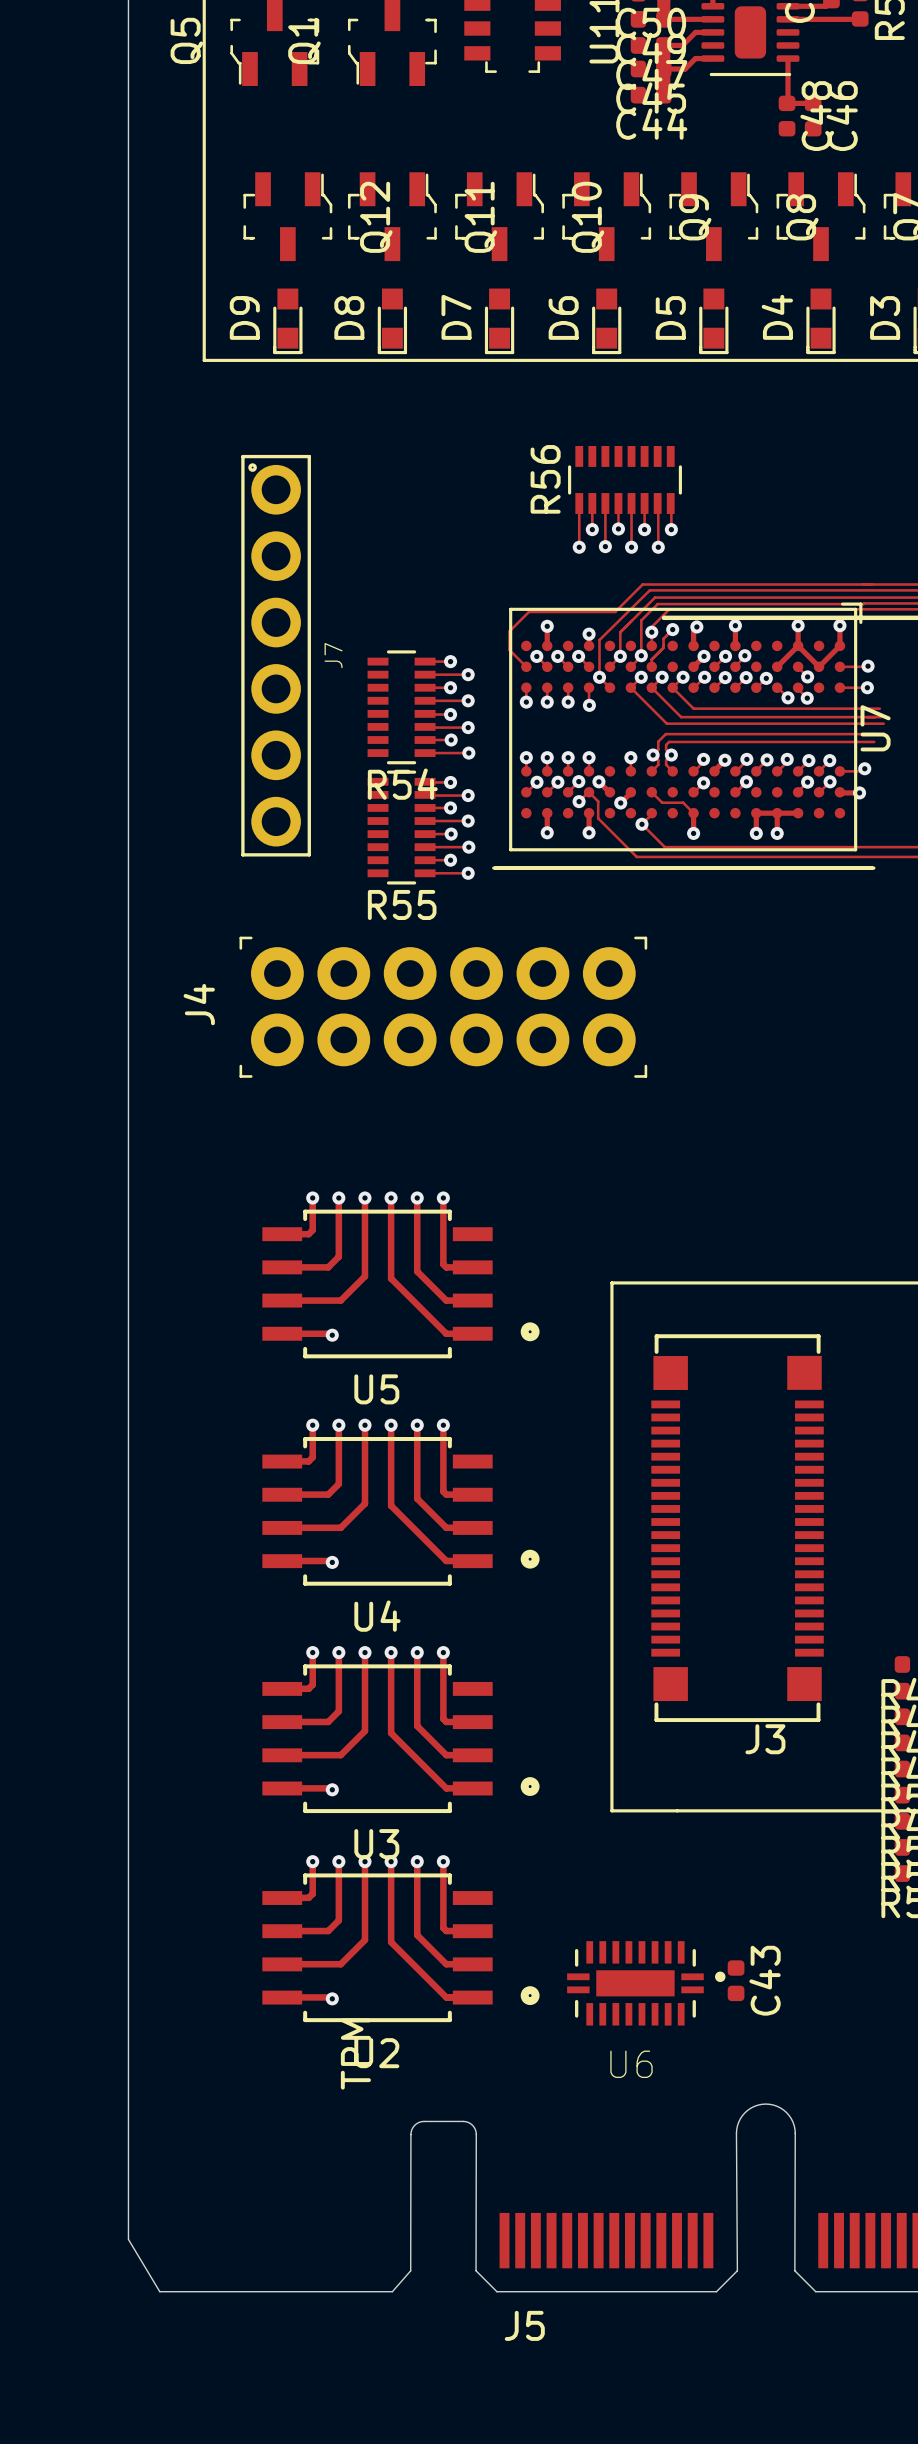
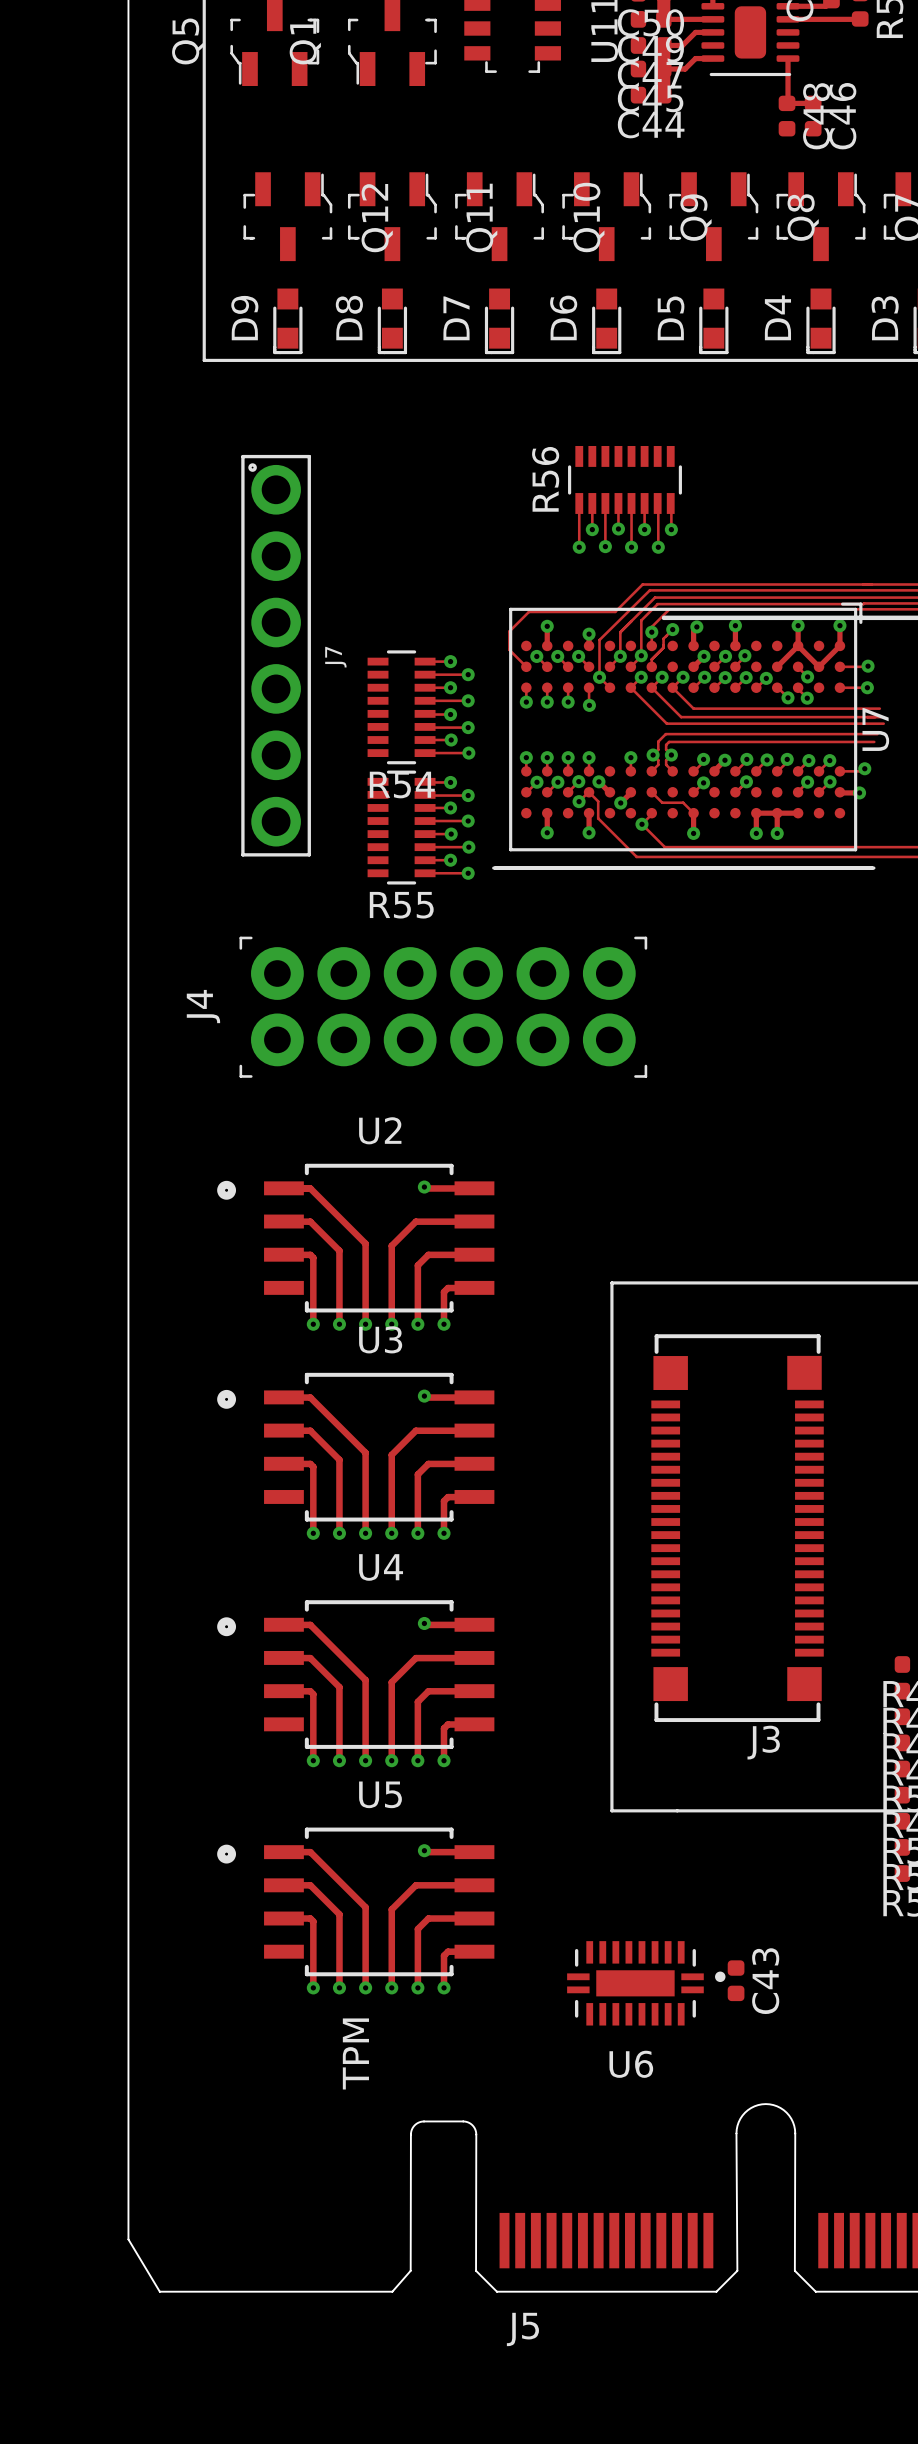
track: none -> (424, 1187) (474, 1188)
track: none -> (283, 1188) (310, 1188) (365, 1243) (365, 1324)
track: (312, 1198) (312, 1230) (308, 1234) (282, 1234) -> none
via: (312, 1198) -> none
track: (338, 1198) (338, 1256) (328, 1267) (282, 1267) -> none
via: (338, 1198) -> none
track: (364, 1198) (364, 1276) (340, 1300) (282, 1300) -> none
via: (364, 1198) -> none
track: (391, 1198) (391, 1278) (446, 1333) (472, 1333) -> none
via: (391, 1198) -> none
track: (417, 1198) (417, 1271) (446, 1300) (472, 1300) -> none
via position: (417, 1198) -> (424, 1187)
track: (443, 1198) (443, 1264) (446, 1267) (472, 1267) -> none
via: (443, 1198) -> none
track: none -> (283, 1221) (310, 1221) (339, 1250) (339, 1324)
track: none -> (474, 1221) (415, 1221) (391, 1245) (391, 1324)
track: none -> (283, 1254) (310, 1254) (313, 1257) (313, 1324)
track: none -> (474, 1254) (428, 1254) (417, 1265) (417, 1324)
U5 rotation: 0° (400, 1283) -> 180° (355, 1901)
U5 position: (400, 1283) -> (355, 1901)
track: none -> (474, 1288) (447, 1288) (444, 1292) (444, 1324)
via: none -> (313, 1324)
via: none -> (365, 1324)
via: none -> (391, 1324)
via: none -> (417, 1324)
via: none -> (444, 1324)
track: (282, 1333) (332, 1335) -> none
via position: (332, 1335) -> (339, 1324)
track: none -> (424, 1396) (474, 1397)
via: none -> (424, 1396)
track: none -> (283, 1397) (310, 1397) (365, 1452) (365, 1533)
track: (312, 1425) (312, 1457) (308, 1461) (282, 1461) -> none
via: (312, 1425) -> none
track: (338, 1425) (338, 1484) (328, 1494) (282, 1494) -> none
via: (338, 1425) -> none
track: (364, 1425) (364, 1503) (340, 1527) (282, 1527) -> none
via: (364, 1425) -> none
track: (391, 1425) (391, 1505) (446, 1560) (472, 1560) -> none
via: (391, 1425) -> none
track: (417, 1425) (417, 1498) (446, 1527) (472, 1527) -> none
via: (417, 1425) -> none
track: (443, 1425) (443, 1491) (446, 1494) (472, 1494) -> none
via: (443, 1425) -> none
track: none -> (283, 1430) (310, 1430) (339, 1459) (339, 1533)
track: none -> (474, 1430) (415, 1430) (391, 1454) (391, 1533)
track: none -> (283, 1463) (310, 1463) (313, 1466) (313, 1533)
track: none -> (474, 1463) (428, 1463) (417, 1474) (417, 1533)
track: none -> (474, 1497) (447, 1497) (444, 1501) (444, 1533)
U4 rotation: 0° (400, 1511) -> 180° (355, 1674)
U4 position: (400, 1511) -> (355, 1674)
via: none -> (313, 1533)
via: none -> (339, 1533)
via: none -> (365, 1533)
via: none -> (391, 1533)
via: none -> (417, 1533)
via: none -> (444, 1533)
track: (282, 1560) (332, 1562) -> none
via: (332, 1562) -> none
track: none -> (424, 1623) (474, 1624)
via: none -> (424, 1623)
track: none -> (283, 1624) (310, 1624) (365, 1680) (365, 1760)
track: (312, 1652) (312, 1684) (308, 1688) (282, 1688) -> none
via: (312, 1652) -> none
track: (338, 1652) (338, 1711) (328, 1721) (282, 1721) -> none
via: (338, 1652) -> none
track: (364, 1652) (364, 1730) (340, 1755) (282, 1755) -> none
via: (364, 1652) -> none
track: (391, 1652) (391, 1733) (446, 1788) (472, 1788) -> none
via: (391, 1652) -> none
track: (417, 1652) (417, 1726) (446, 1755) (472, 1755) -> none
via: (417, 1652) -> none
track: (443, 1652) (443, 1719) (446, 1721) (472, 1721) -> none
via: (443, 1652) -> none
track: none -> (283, 1658) (310, 1658) (339, 1687) (339, 1760)
track: none -> (474, 1658) (415, 1658) (391, 1682) (391, 1760)
track: none -> (283, 1691) (310, 1691) (313, 1694) (313, 1760)
track: none -> (474, 1691) (428, 1691) (417, 1701) (417, 1760)
track: none -> (474, 1724) (447, 1724) (444, 1728) (444, 1760)
U3 rotation: 0° (400, 1738) -> 180° (355, 1447)
U3 position: (400, 1738) -> (355, 1447)
via: none -> (313, 1760)
via: none -> (339, 1760)
via: none -> (365, 1760)
via: none -> (391, 1760)
via: none -> (417, 1760)
via: none -> (444, 1760)
track: (282, 1788) (332, 1789) -> none
via: (332, 1789) -> none
track: none -> (424, 1850) (474, 1852)
track: none -> (283, 1852) (310, 1852) (365, 1907) (365, 1987)
track: (312, 1861) (312, 1893) (308, 1897) (282, 1897) -> none
via: (312, 1861) -> none
track: (338, 1861) (338, 1920) (328, 1931) (282, 1931) -> none
via: (338, 1861) -> none
track: (364, 1861) (364, 1940) (340, 1964) (282, 1964) -> none
via: (364, 1861) -> none
track: (391, 1861) (391, 1942) (446, 1997) (473, 1997) -> none
via: (391, 1861) -> none
track: (417, 1861) (417, 1935) (446, 1964) (472, 1964) -> none
via position: (417, 1861) -> (424, 1850)
track: (443, 1861) (443, 1928) (446, 1931) (472, 1931) -> none
via: (443, 1861) -> none
track: none -> (283, 1885) (310, 1885) (339, 1914) (339, 1987)
track: none -> (474, 1885) (415, 1885) (391, 1909) (391, 1987)
track: none -> (283, 1918) (310, 1918) (313, 1921) (313, 1987)
track: none -> (474, 1918) (428, 1918) (417, 1929) (417, 1987)
U2 rotation: 0° (400, 1947) -> 180° (355, 1238)
U2 position: (400, 1947) -> (355, 1238)
track: none -> (474, 1951) (448, 1951) (444, 1955) (444, 1987)
via: none -> (313, 1987)
via: none -> (365, 1987)
via: none -> (391, 1987)
via: none -> (417, 1987)
via: none -> (444, 1987)
track: (282, 1997) (332, 1998) -> none
via position: (332, 1998) -> (339, 1987)

